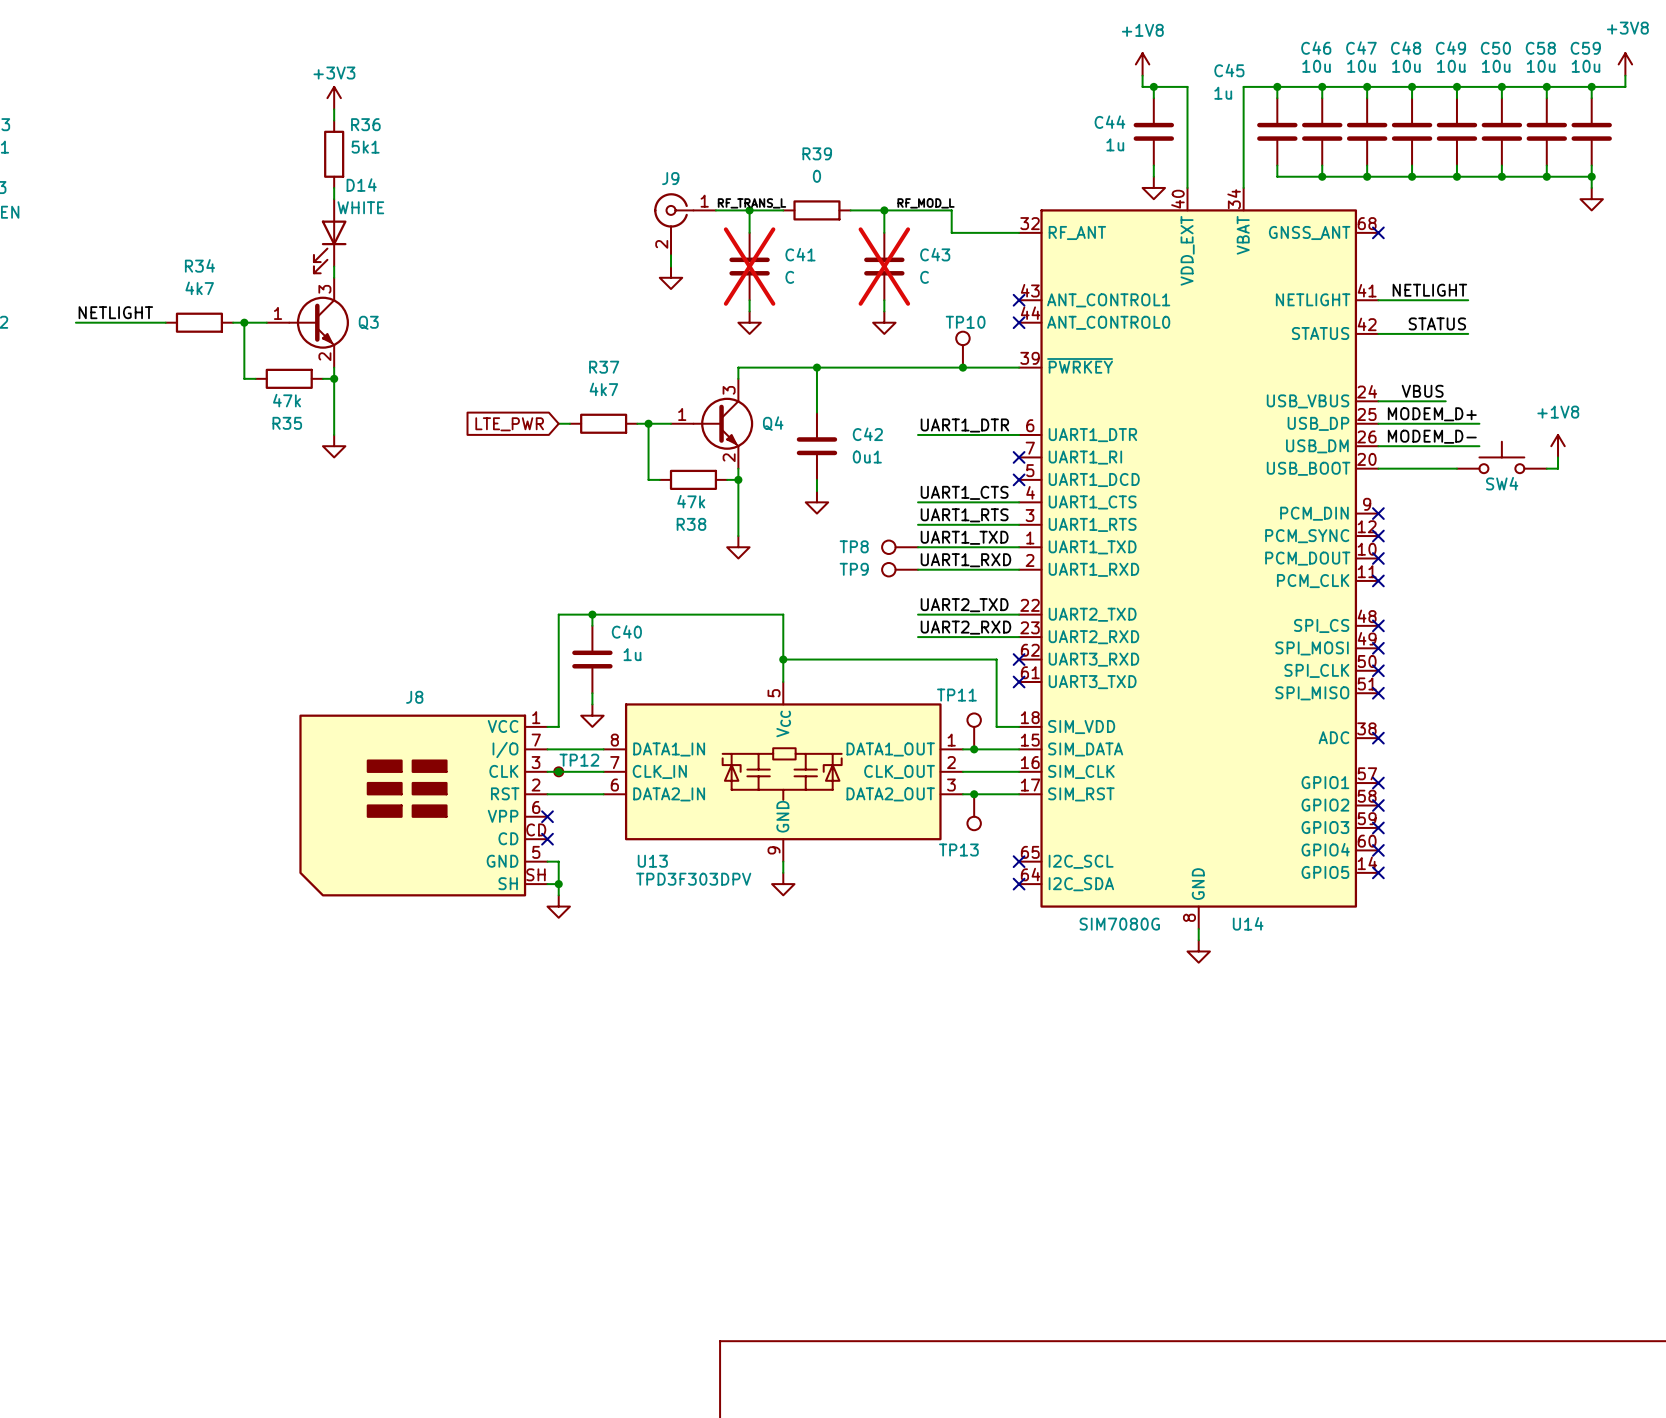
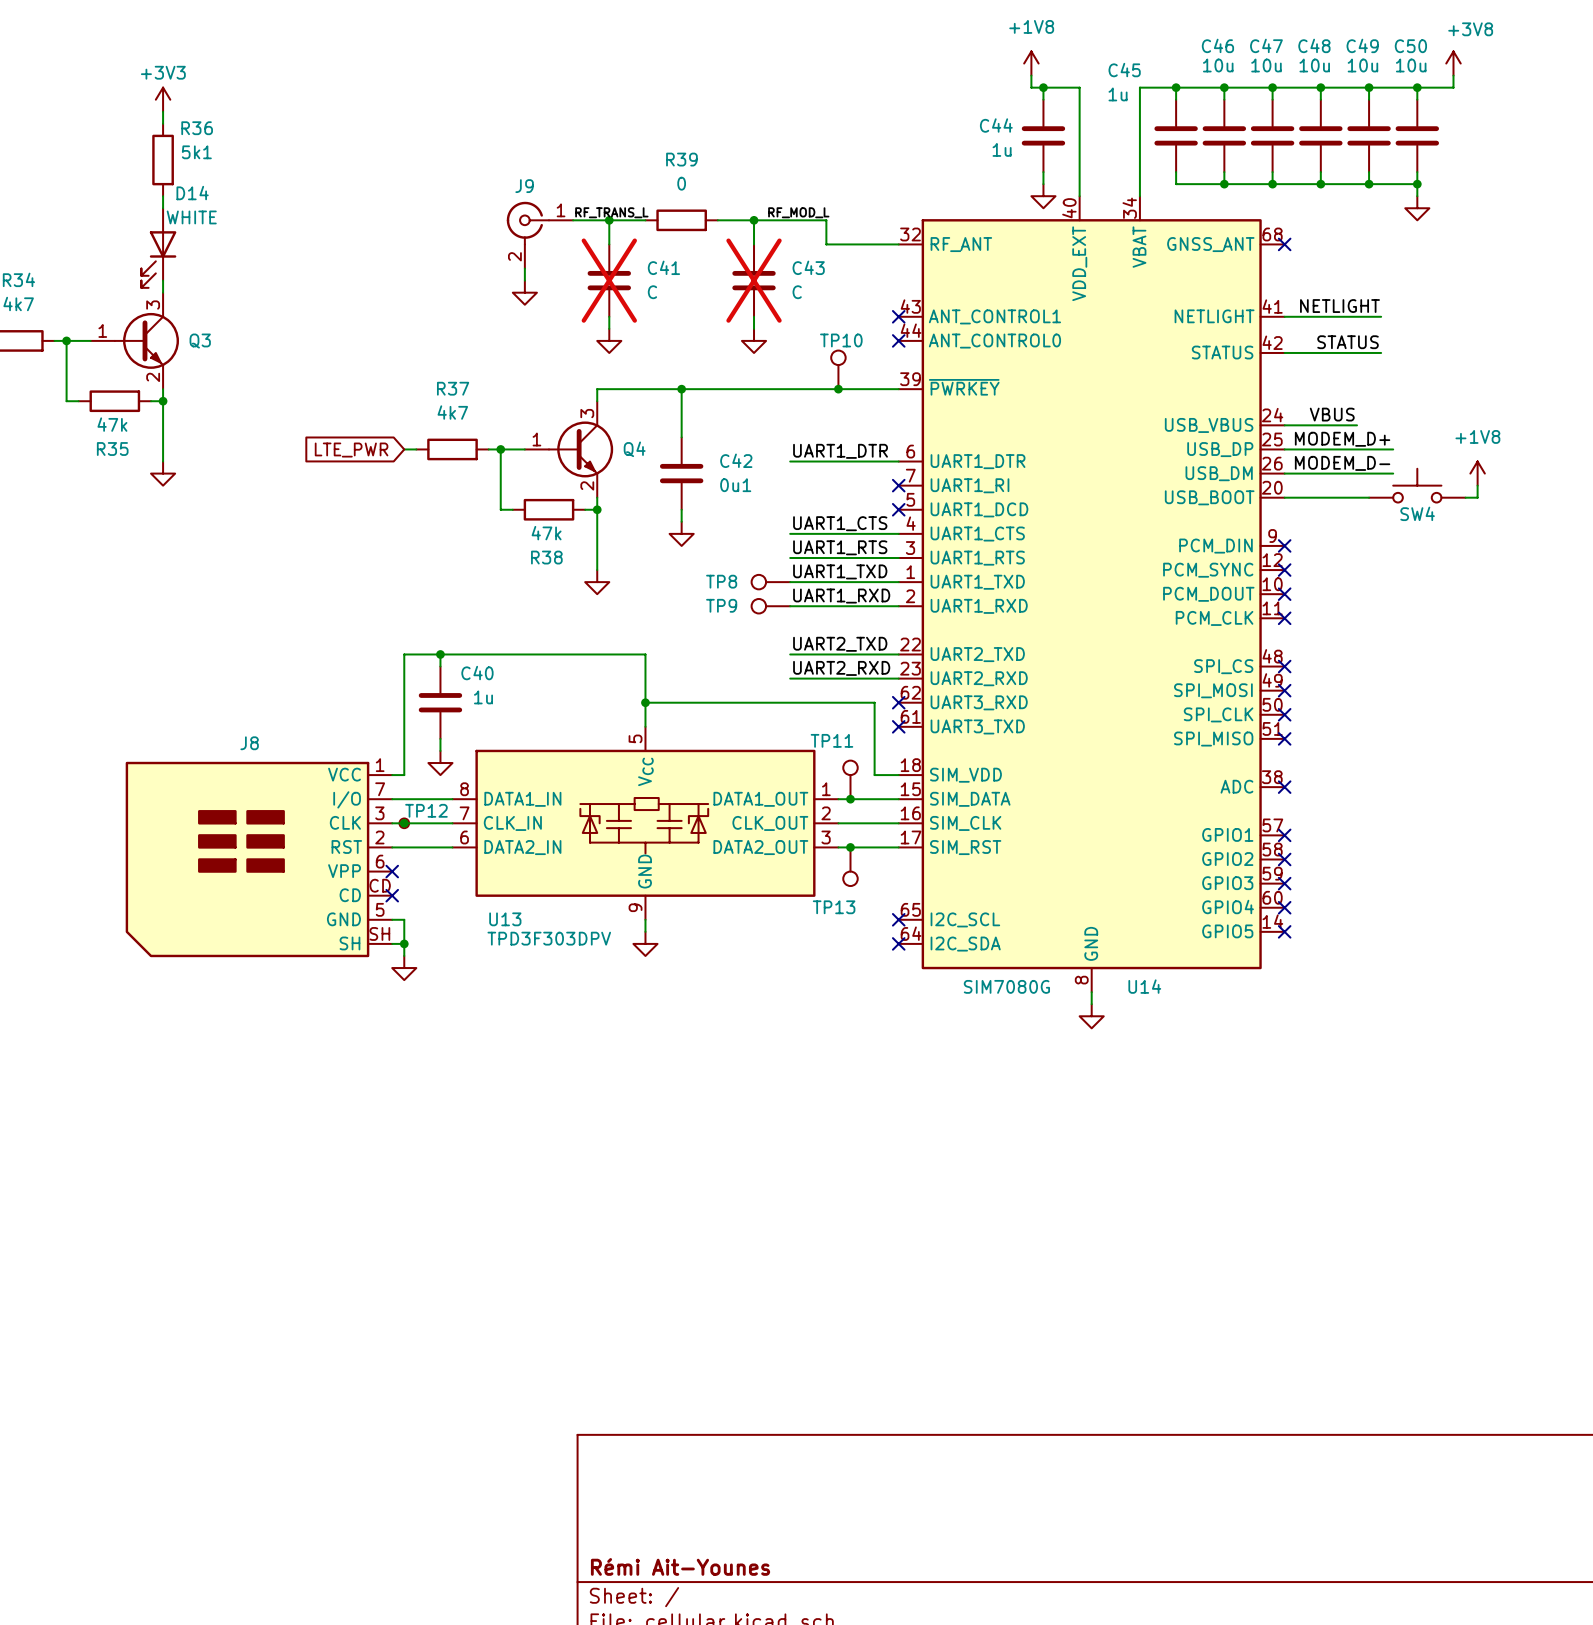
power symbol text position: +3V8 (1627, 28) -> +3V8 (1470, 29)
power symbol position: +3V8 (1625, 64) -> +3V8 (1453, 63)
wire: (1625, 75) (1625, 86) (1535, 86) -> (1453, 75) (1453, 87)
wire: (1546, 86) (1546, 98) -> none
junction: (1546, 86) -> none
wire: (1591, 86) (1591, 98) -> none
junction: (1591, 86) -> none
C58: 10u (1546, 131) -> none
C59: 10u (1591, 131) -> none
wire: (1546, 165) (1546, 176) -> none
wire: (1591, 165) (1591, 187) -> none
wire: (1501, 176) (1591, 176) -> (1417, 184) (1417, 196)
junction: (1546, 176) -> none
junction: (1591, 176) -> none
power symbol position: (1591, 199) -> (1417, 208)

